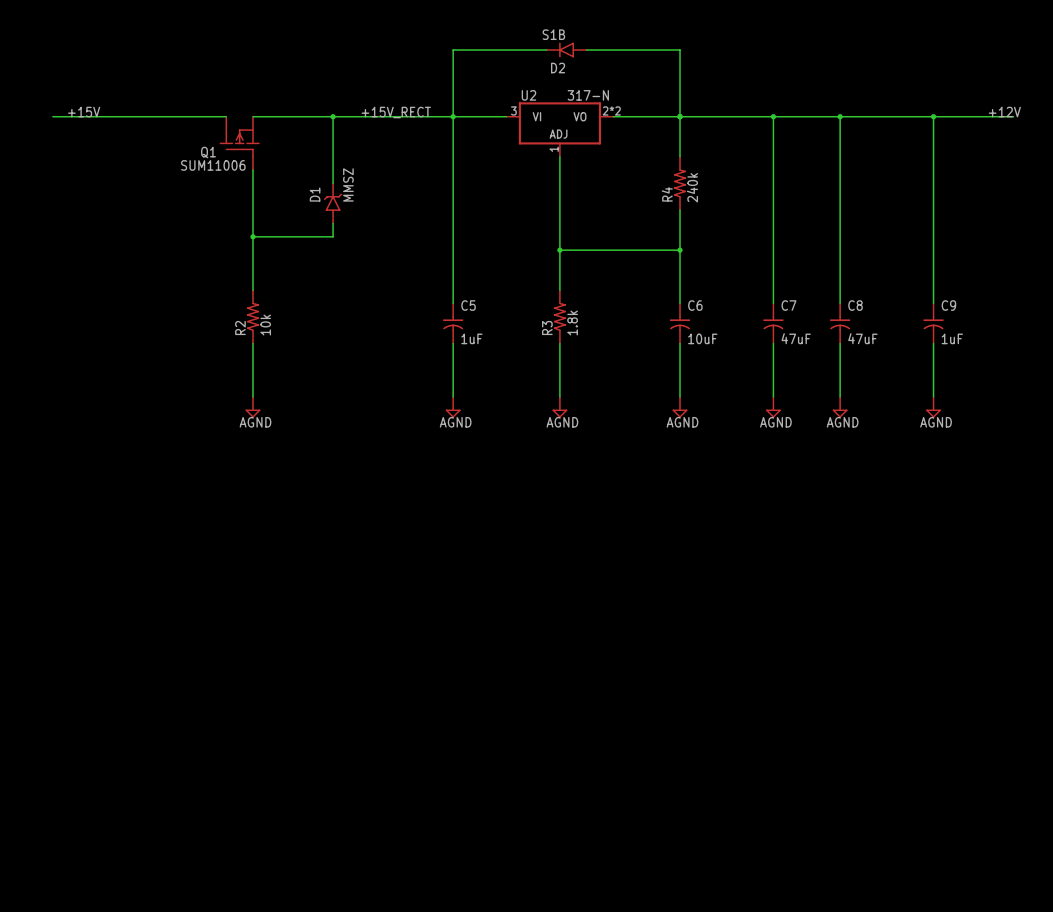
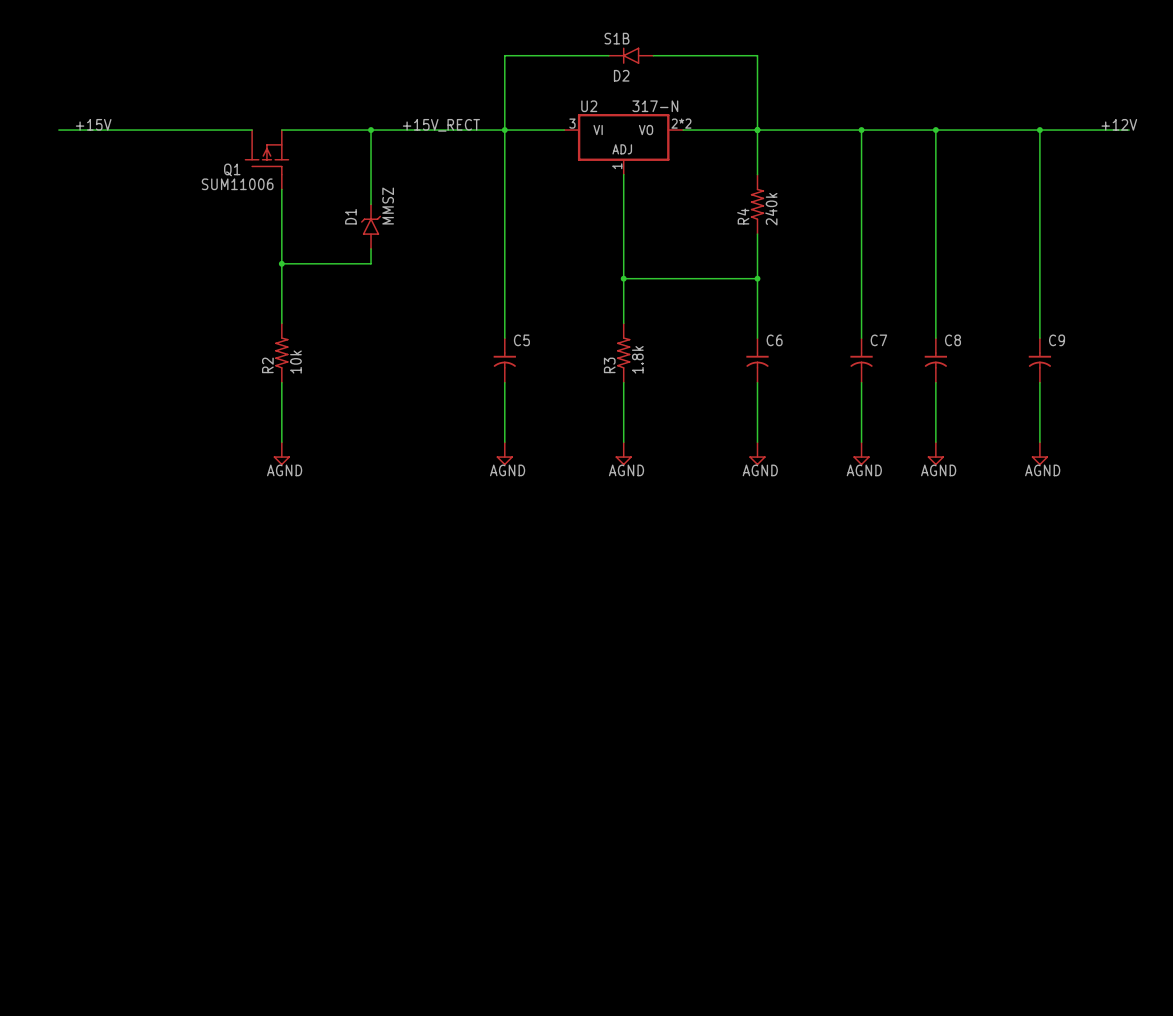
C5 value: 1uF (471, 338) -> none
C6 value: 10uF (702, 338) -> none
C7 value: 47uF (796, 338) -> none
C8 value: 47uF (862, 338) -> none
C9 value: 1uF (952, 338) -> none

